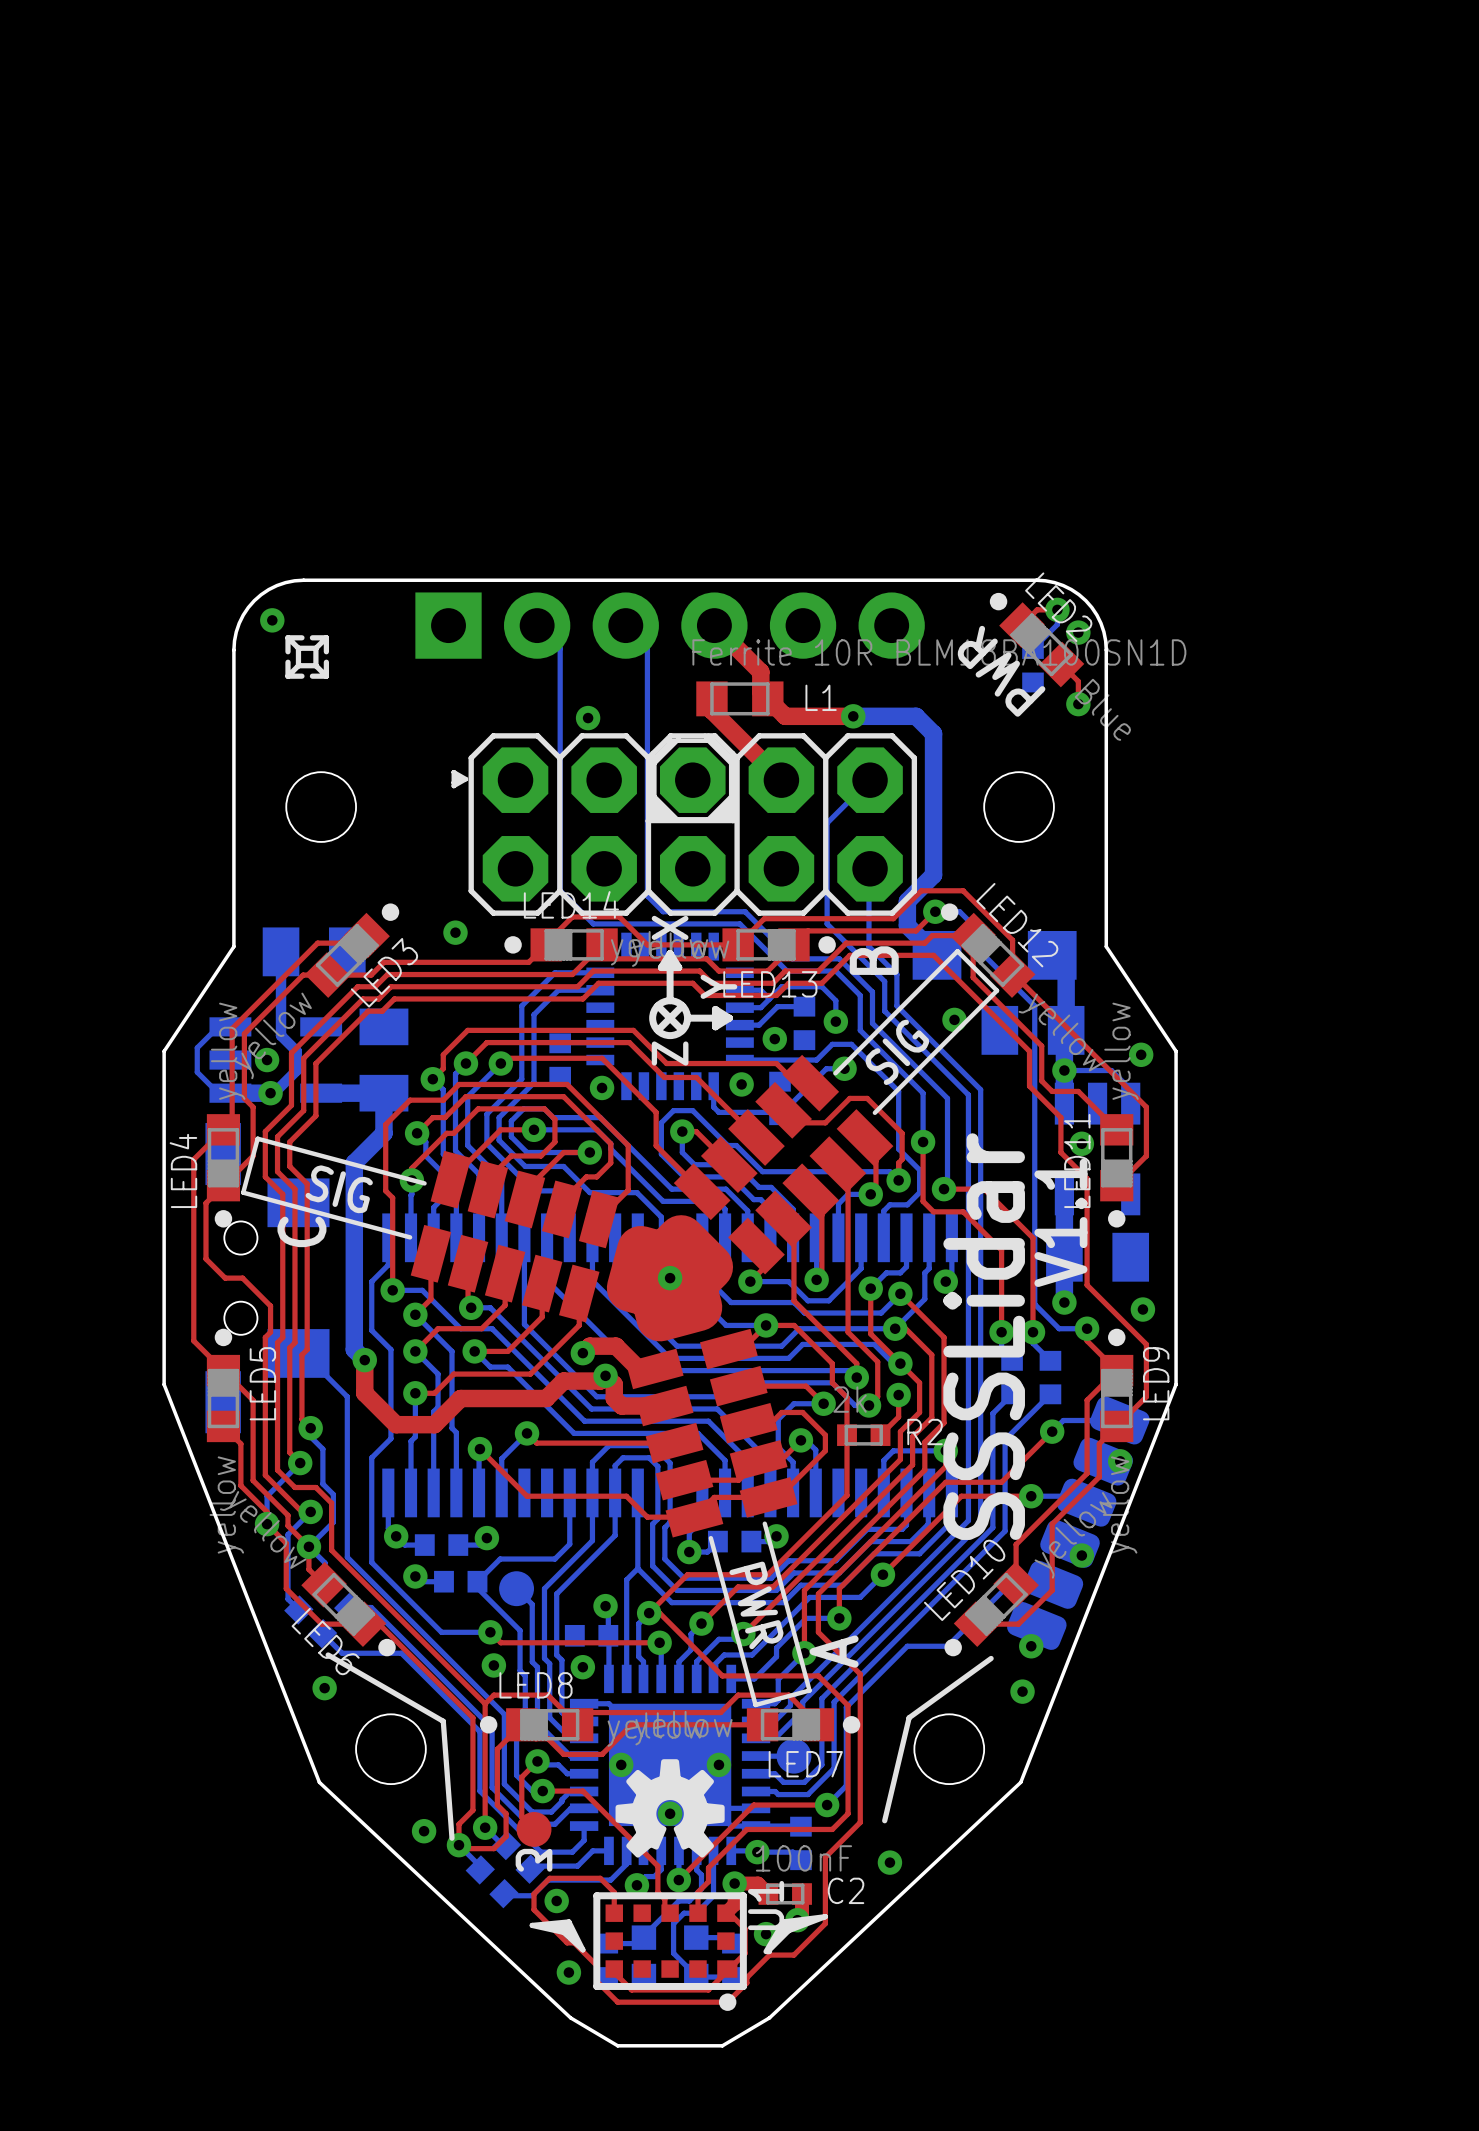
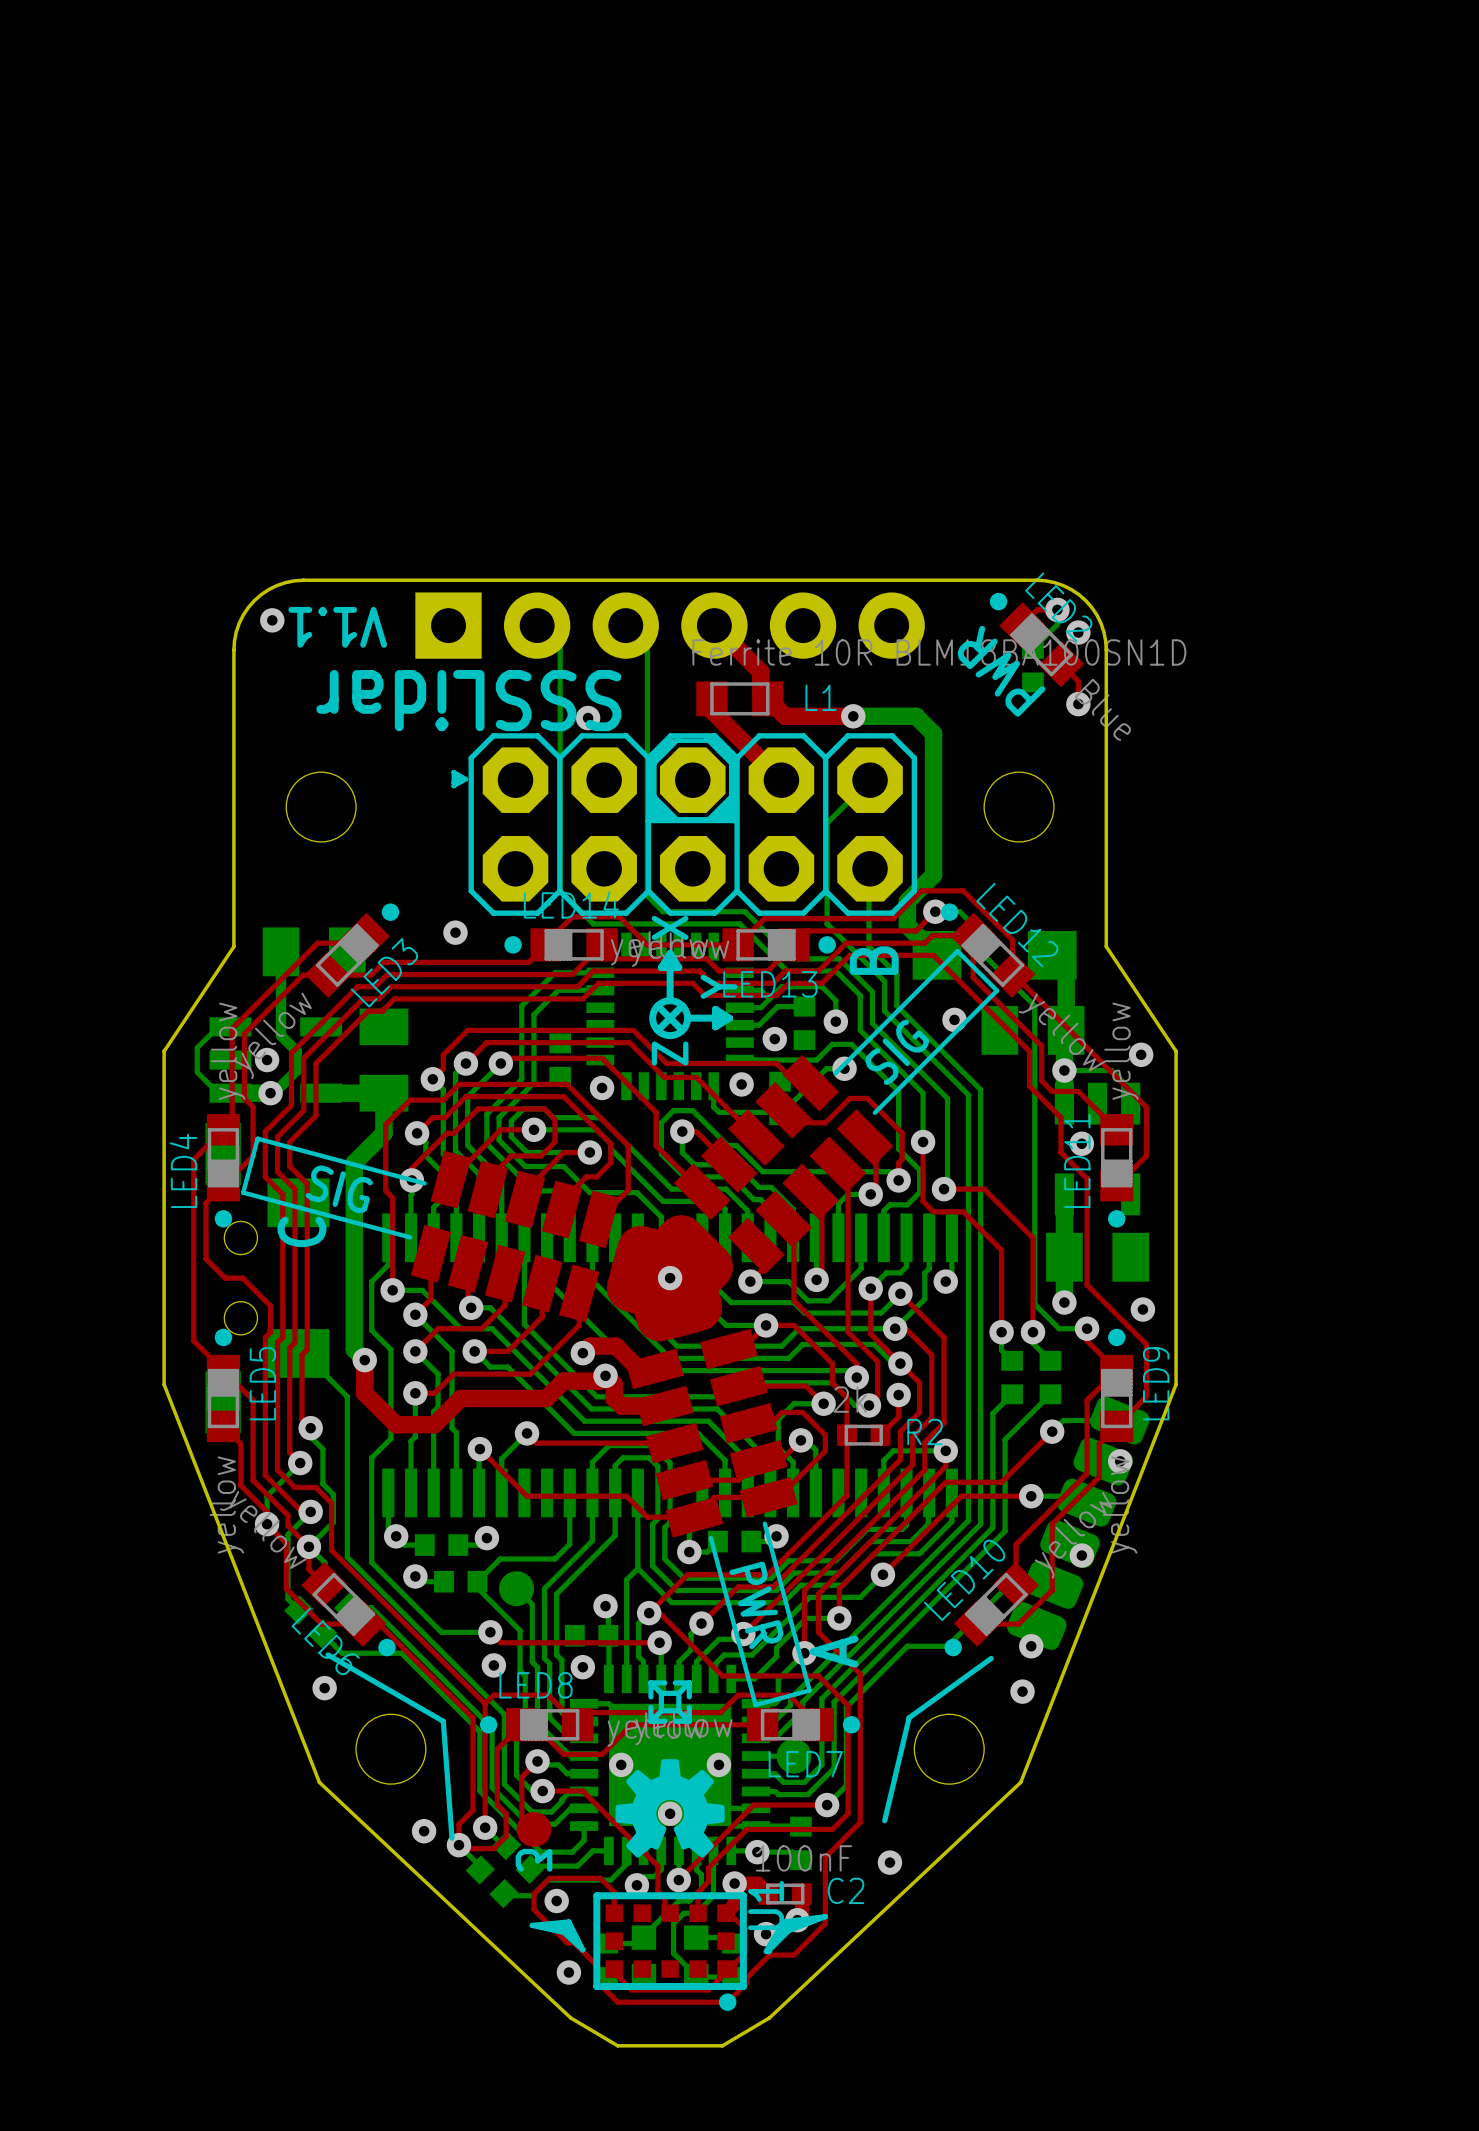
text: none -> V1.1 (337, 627)
drawing: [285, 635, 330, 679] -> none
text: none -> SSSLidar (468, 700)
text: V1.1 (1060, 1222) -> none
text: SSSLidar (984, 1336) -> none
drawing: none -> [648, 1680, 692, 1724]

